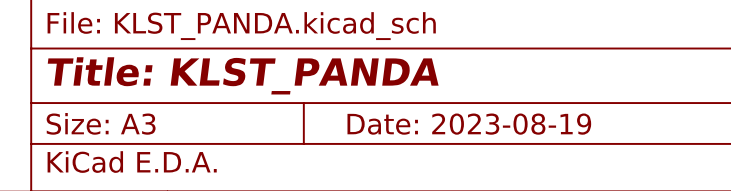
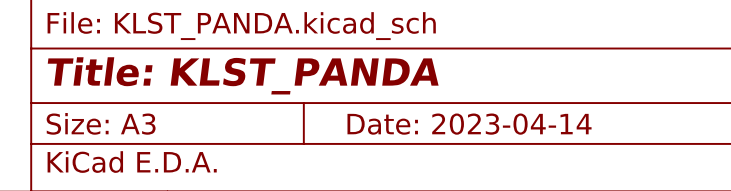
title block: Date: 2023-08-19 (469, 124) -> Date: 2023-04-14 (469, 124)

